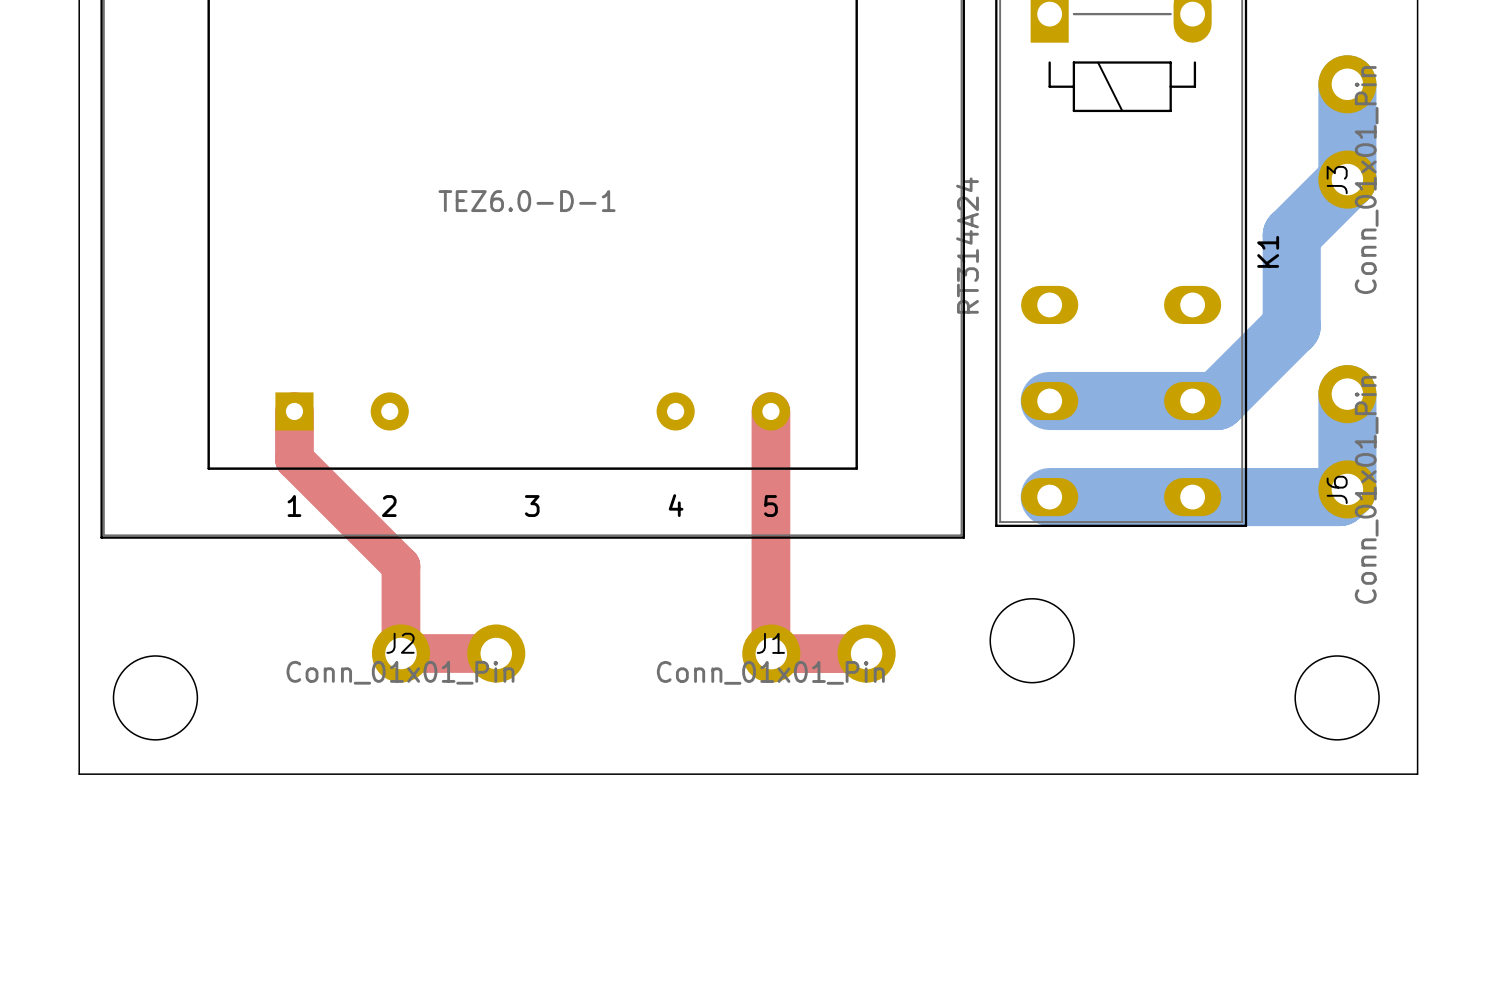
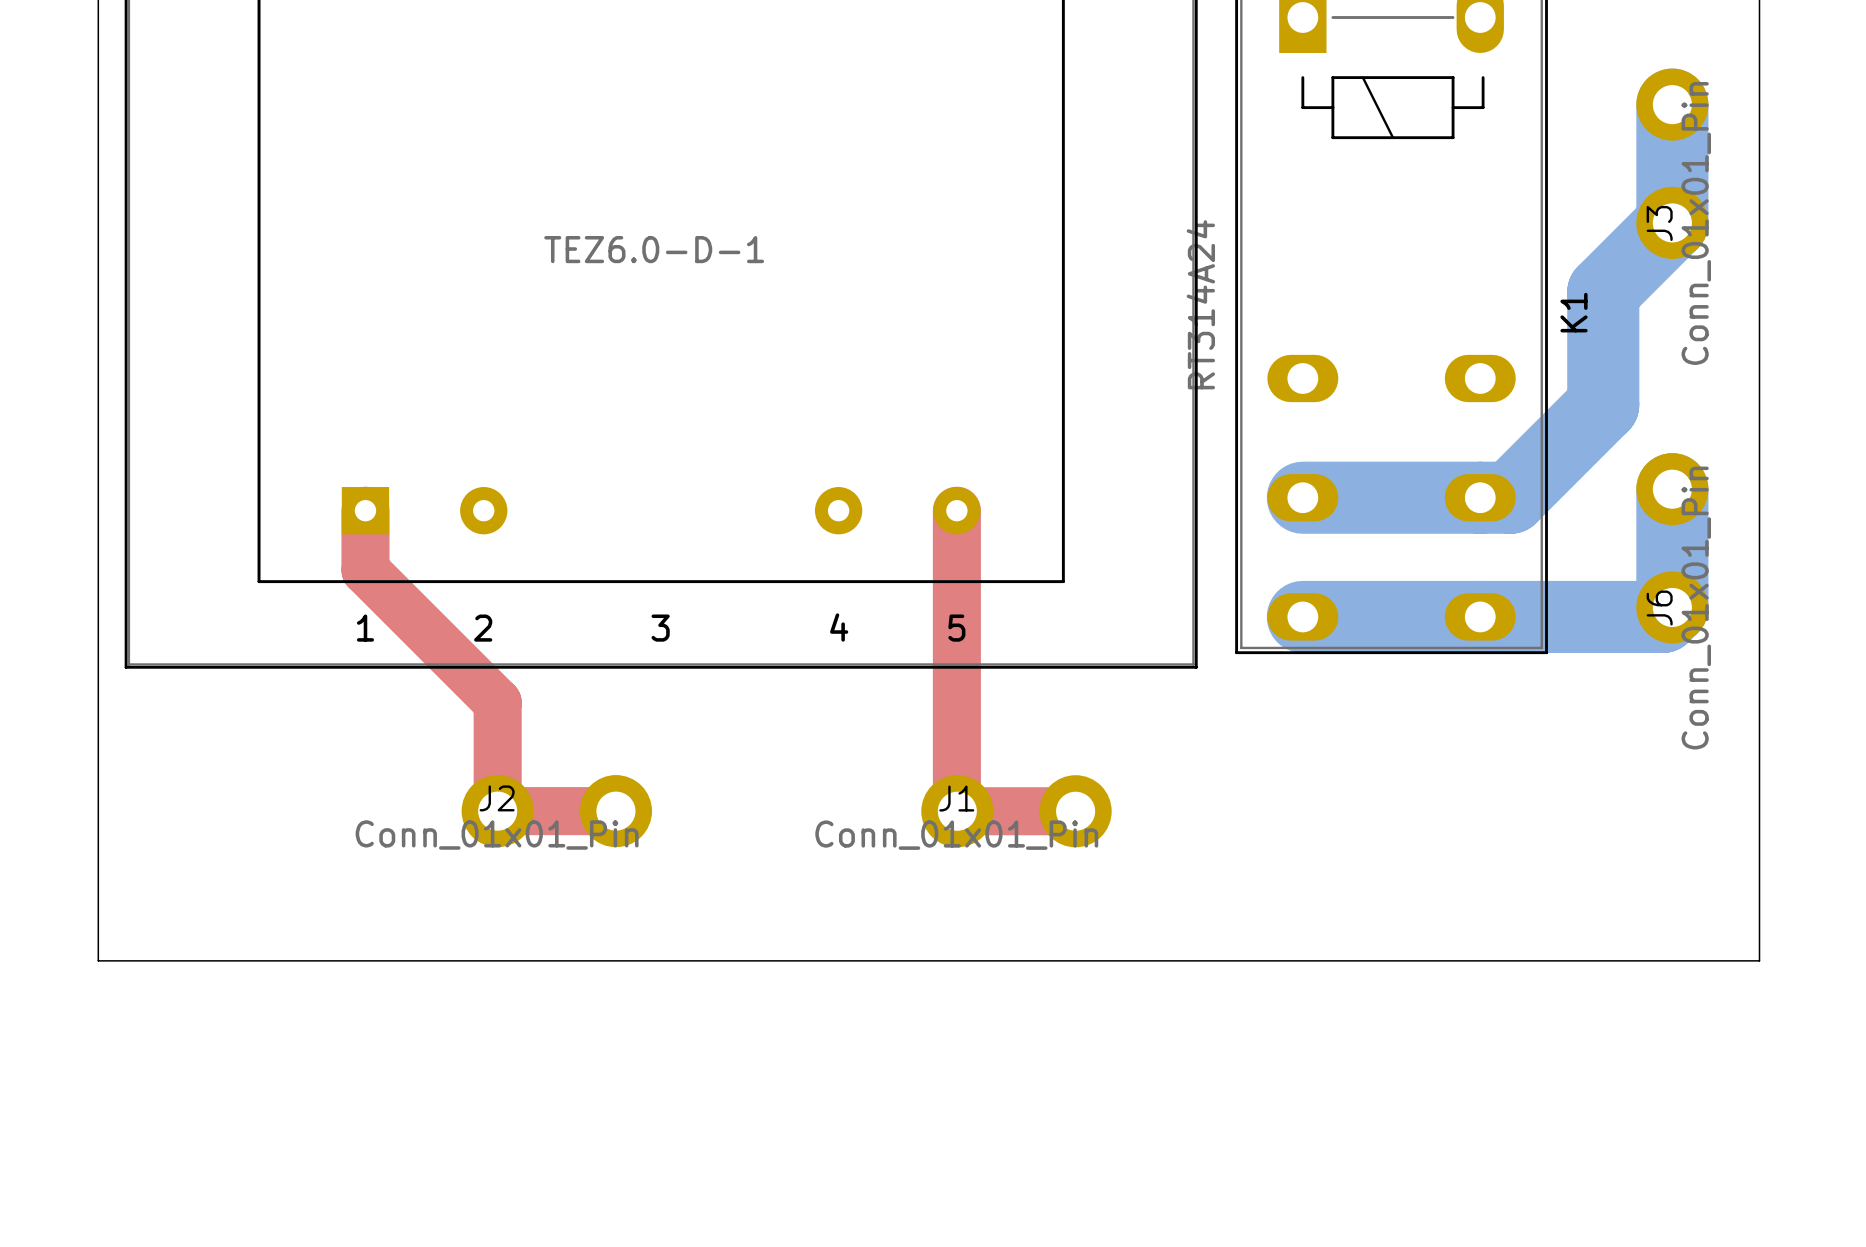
round board edge: [989, 598, 1075, 684] -> none
round board edge: [113, 655, 198, 741] -> none
round board edge: [1294, 655, 1380, 741] -> none

